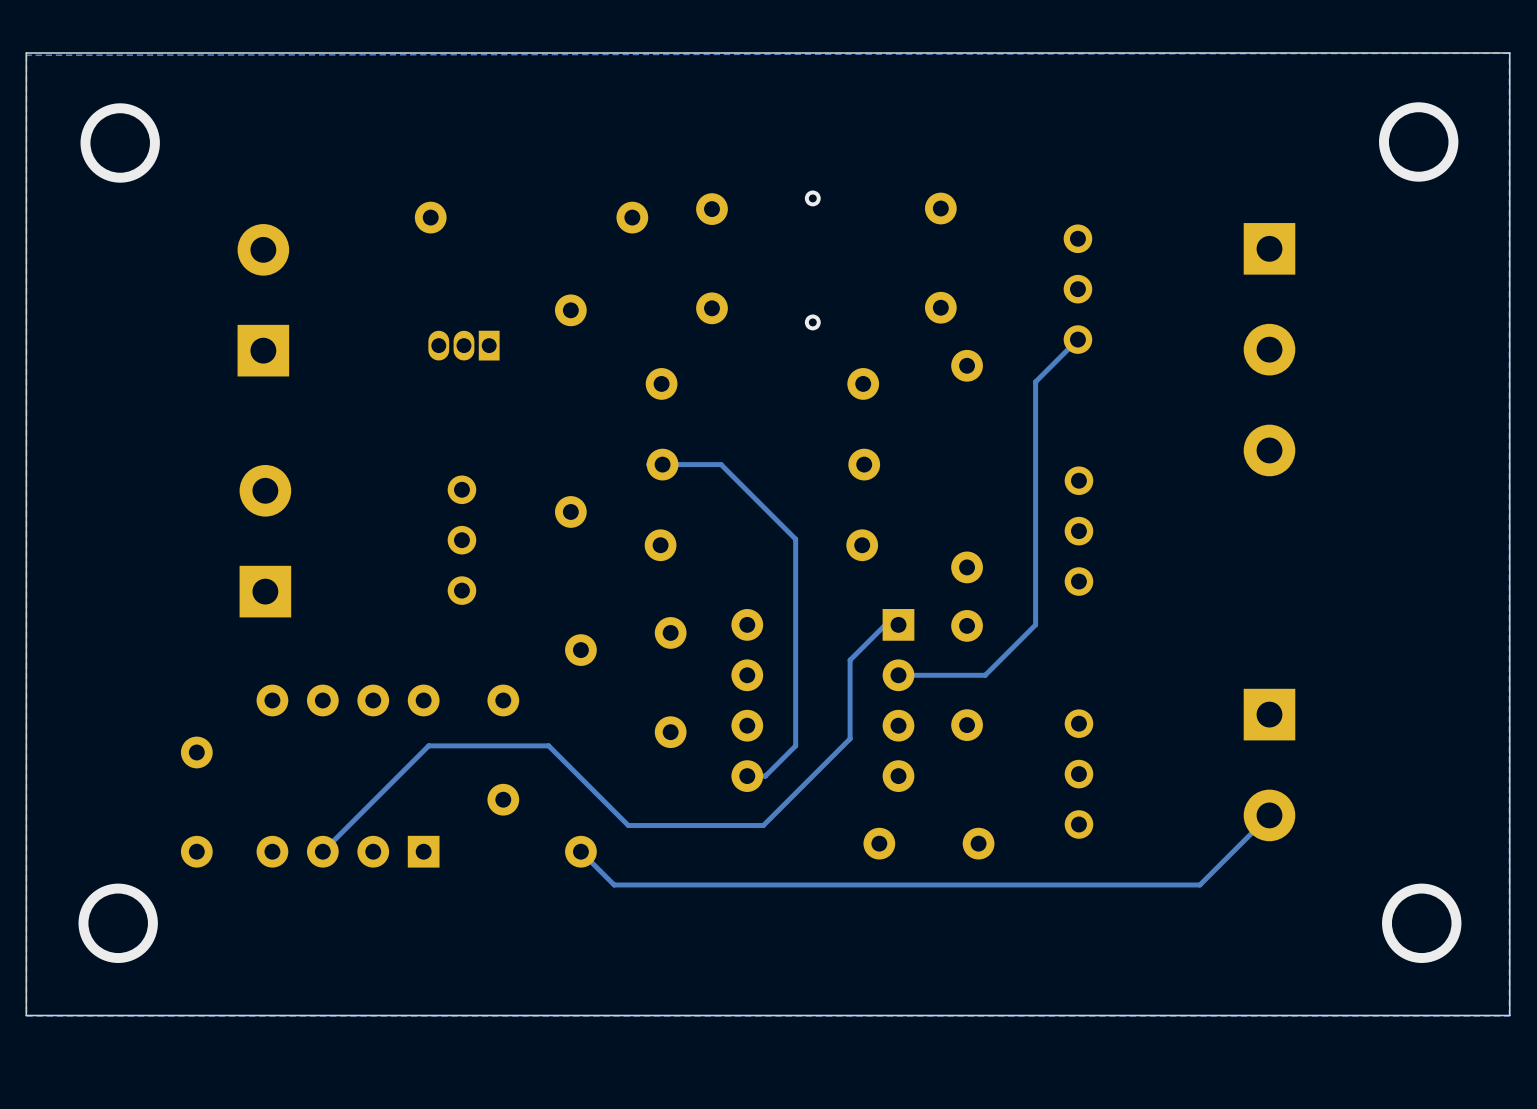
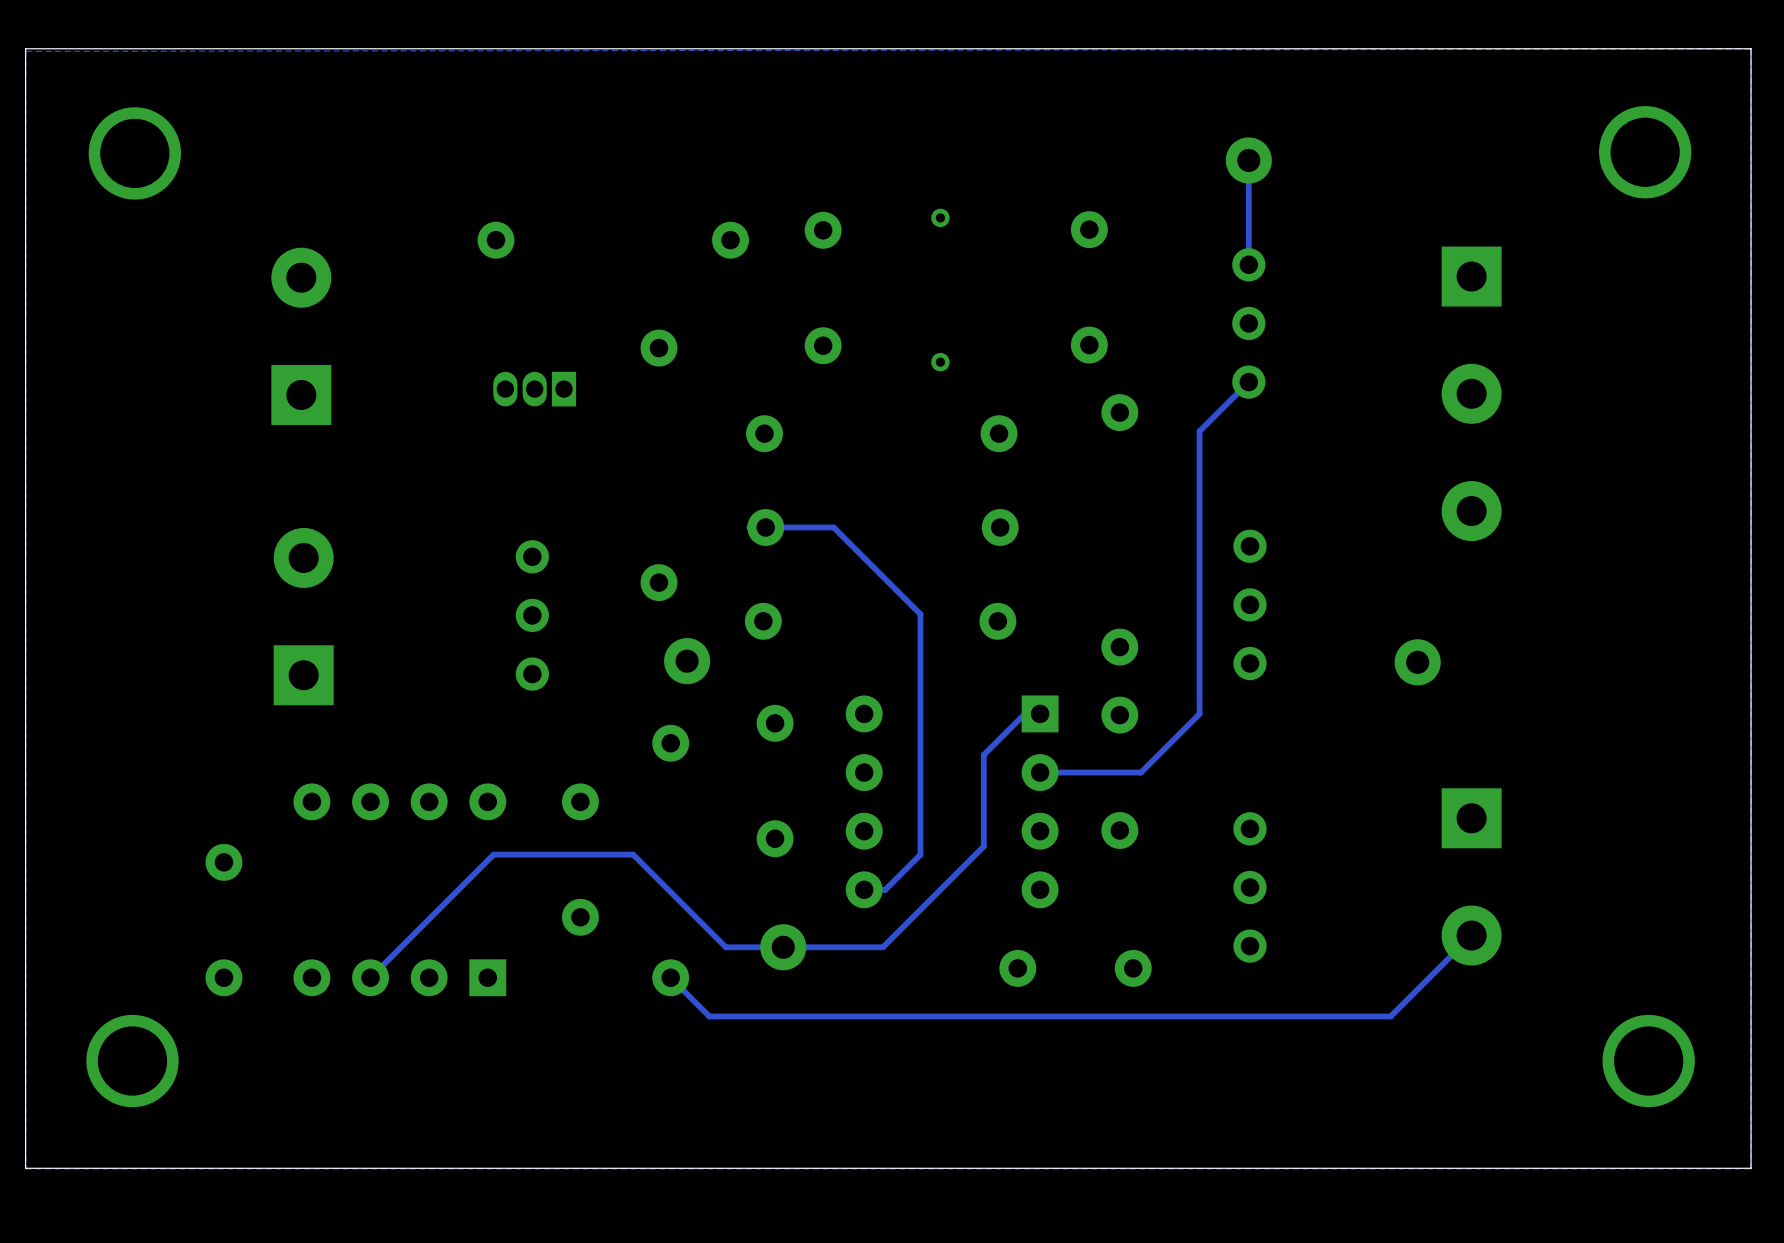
track: none -> (1248, 156) (1248, 264)
part: none -> (1248, 160)
part: none -> (687, 661)
part: none -> (1417, 662)
part: none -> (783, 947)

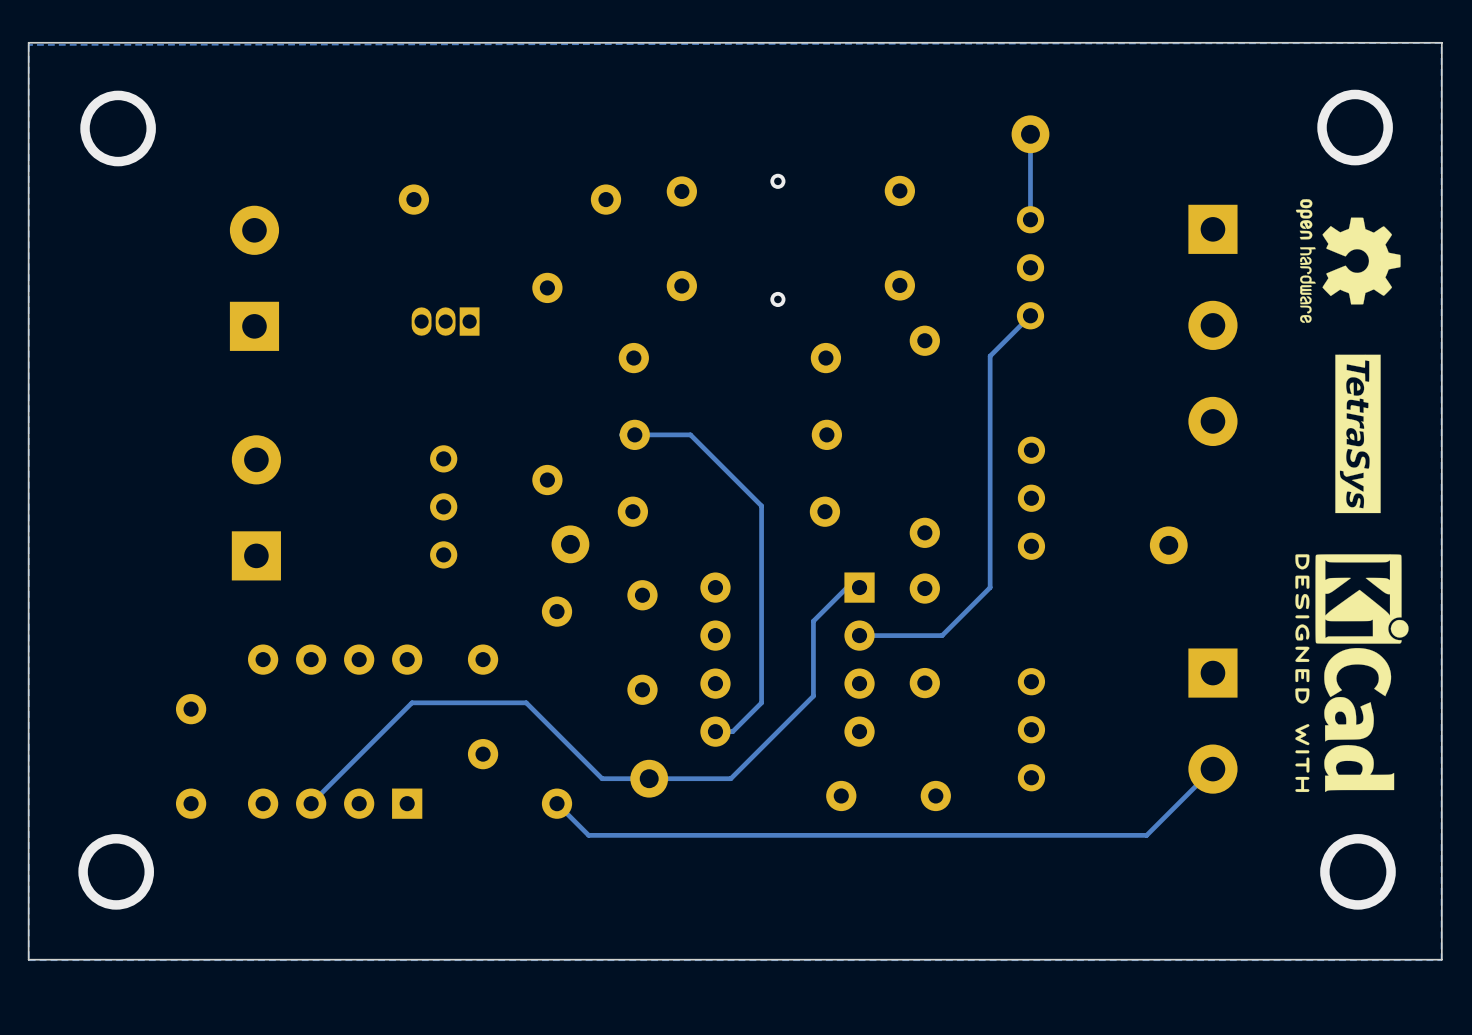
drawing: none -> [1295, 199, 1401, 323]
drawing: none -> [1335, 354, 1381, 514]
drawing: none -> [1295, 554, 1409, 793]

